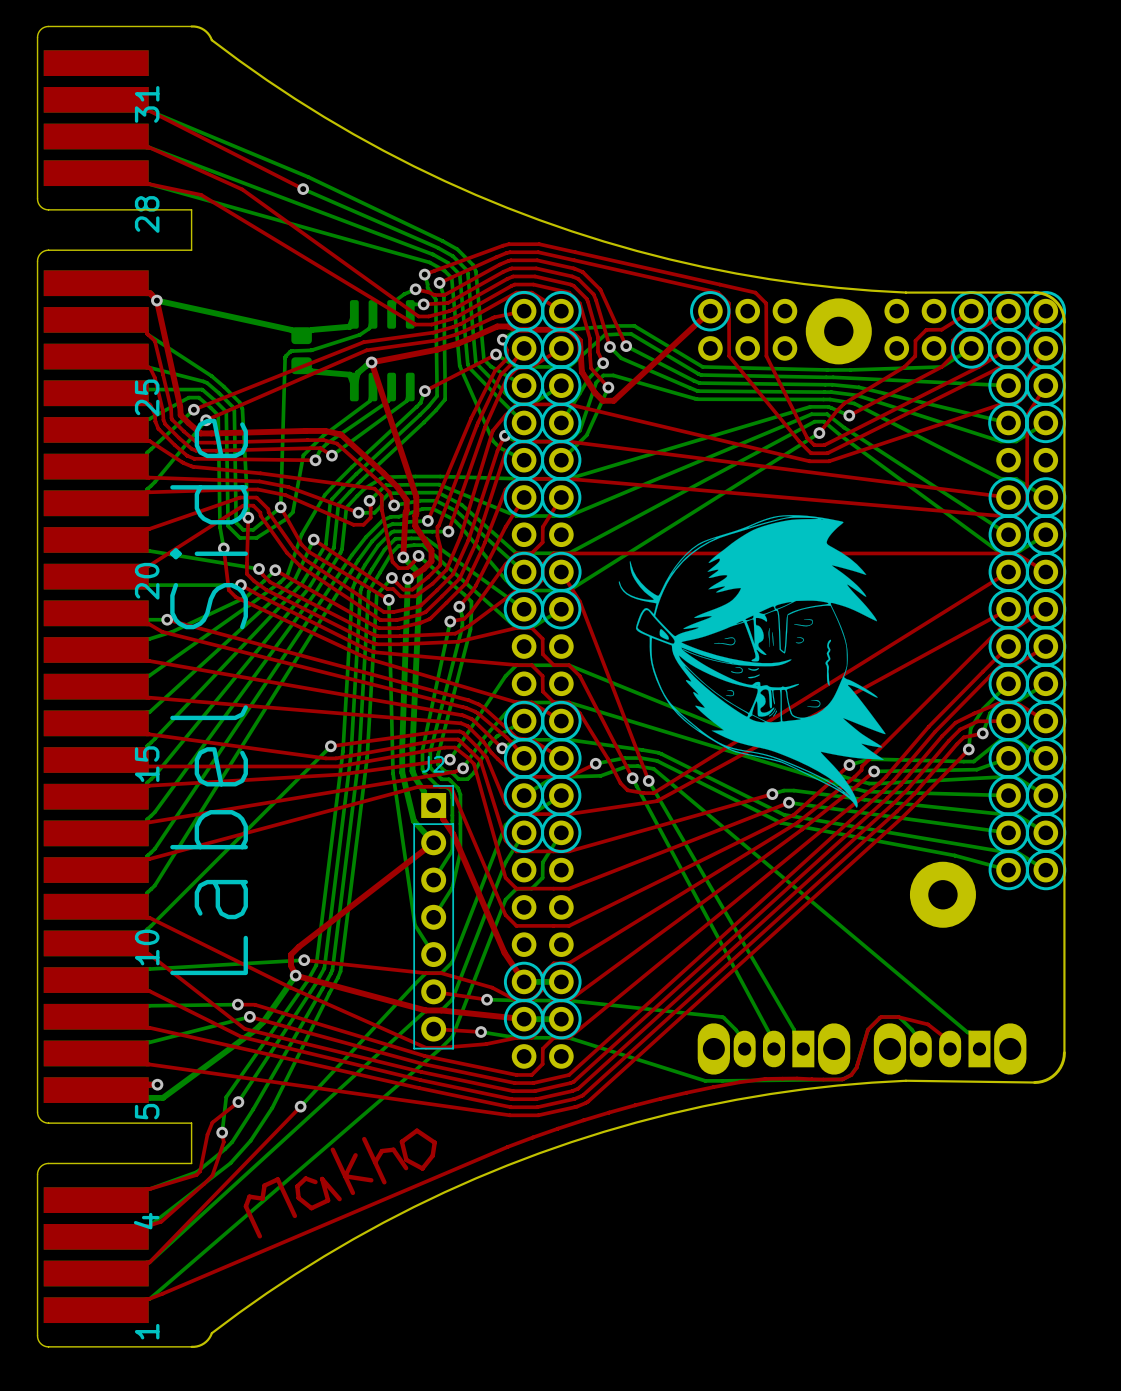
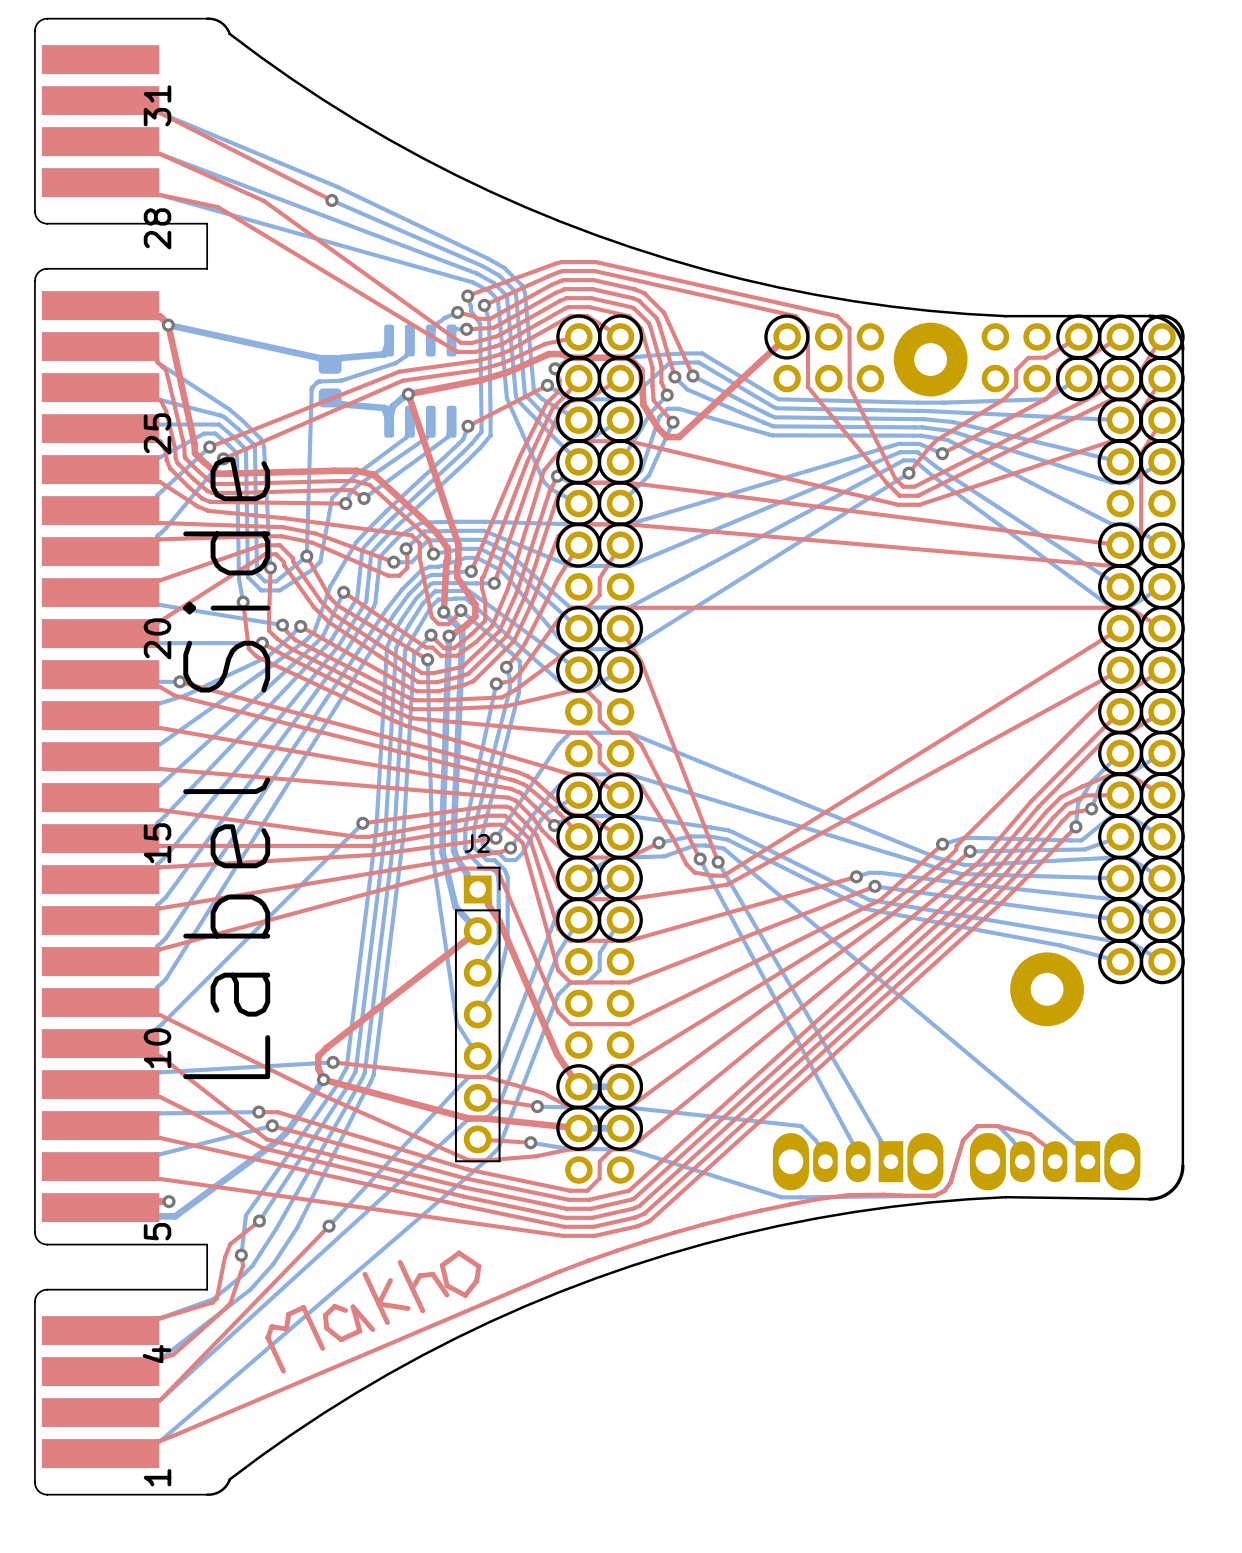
drawing: [618, 515, 886, 808] -> none

